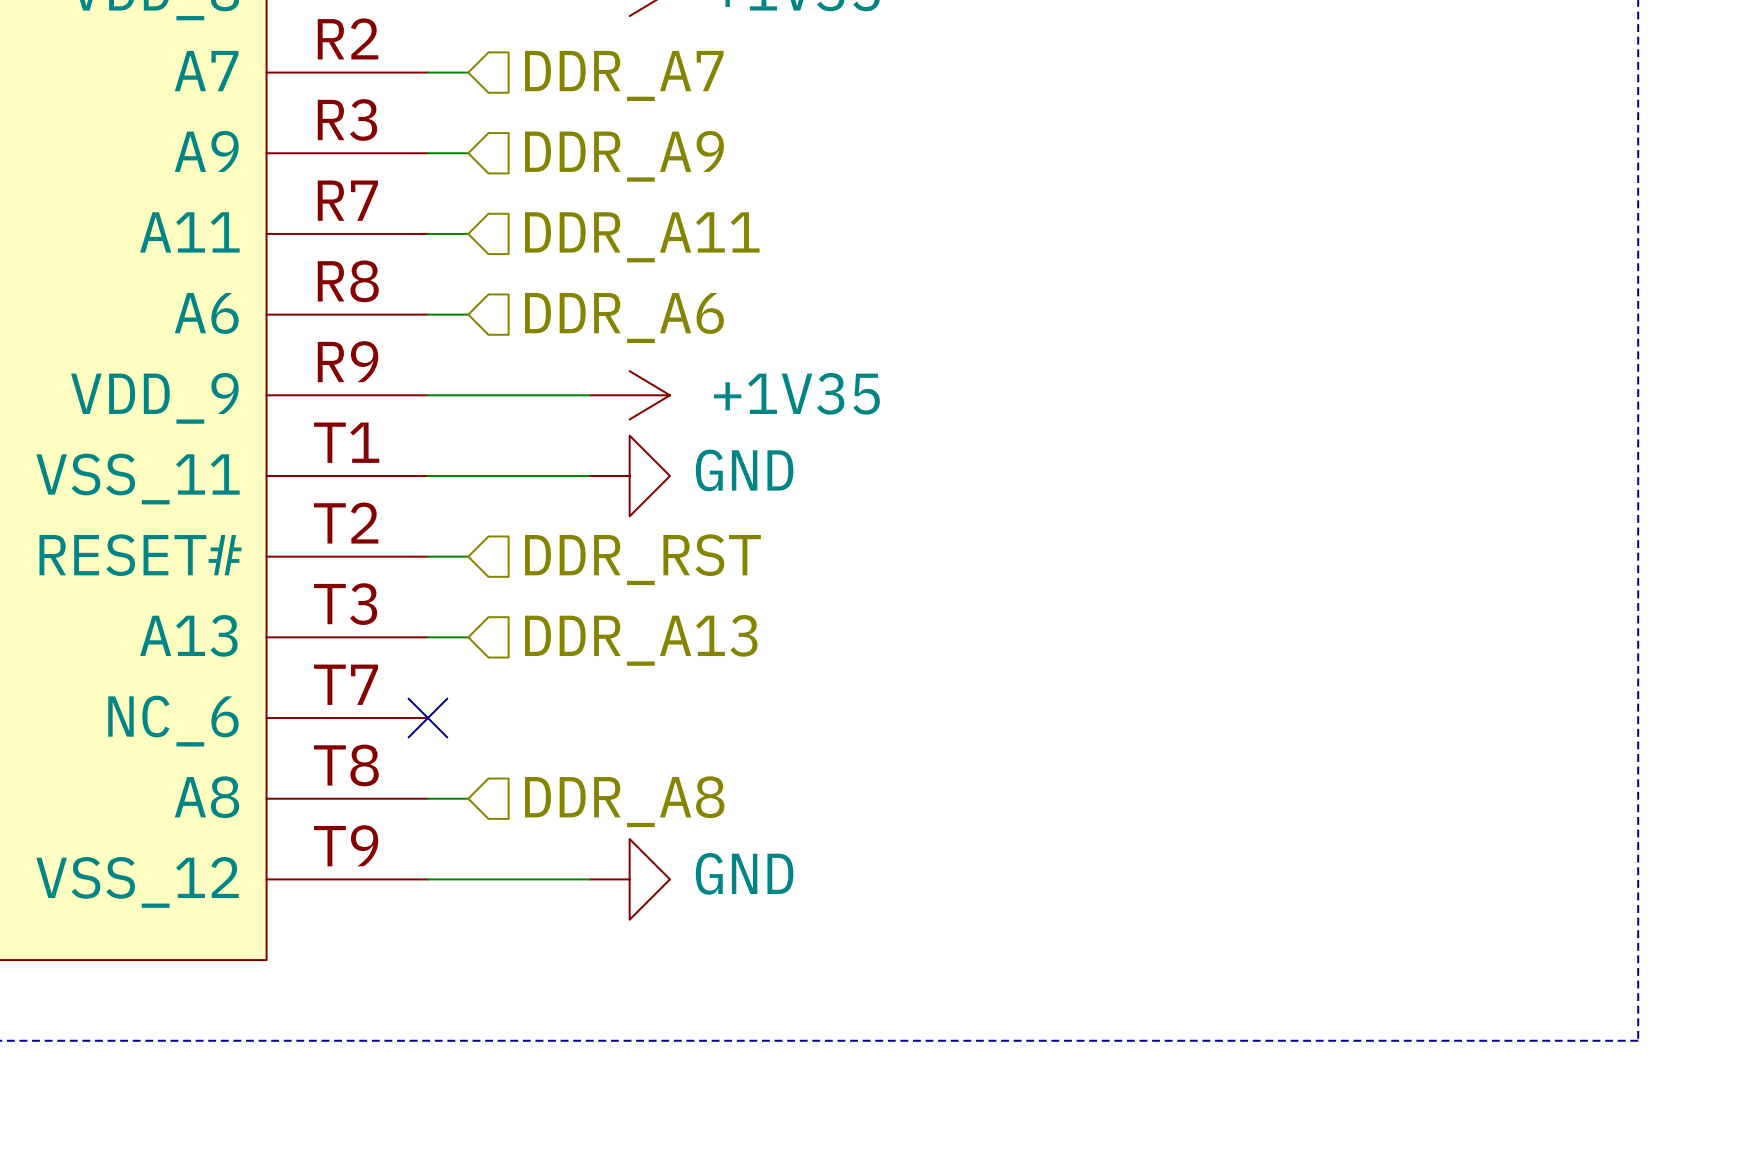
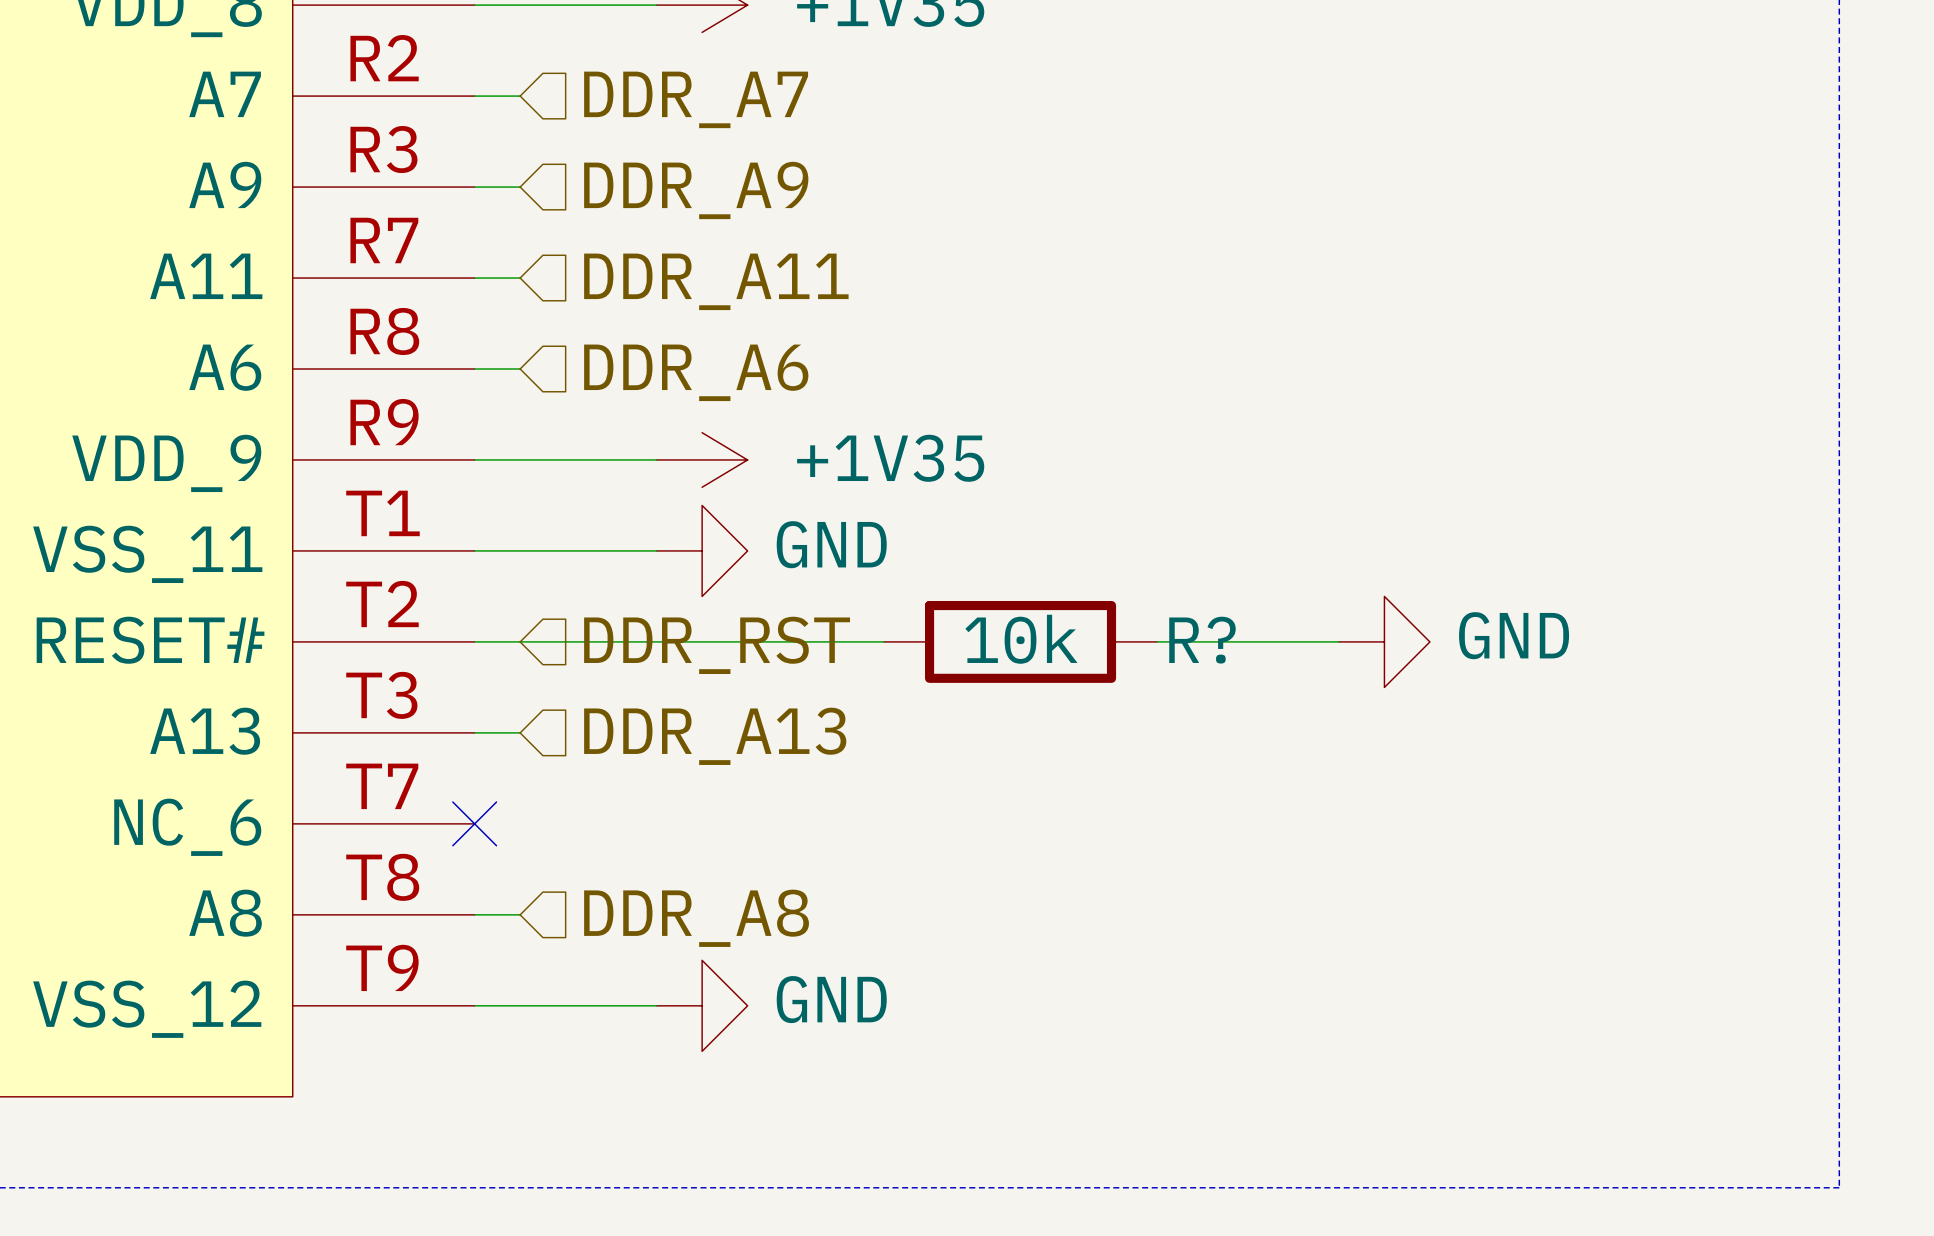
wire: none -> (520, 641) (884, 641)
R?: none -> 10k (1020, 641)
wire: none -> (1156, 641) (1338, 641)
power symbol: none -> GND (1384, 641)

